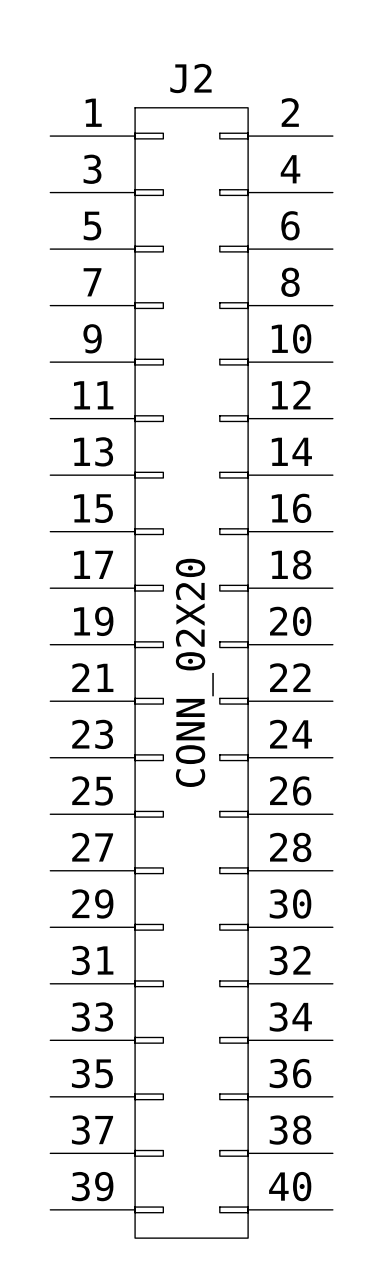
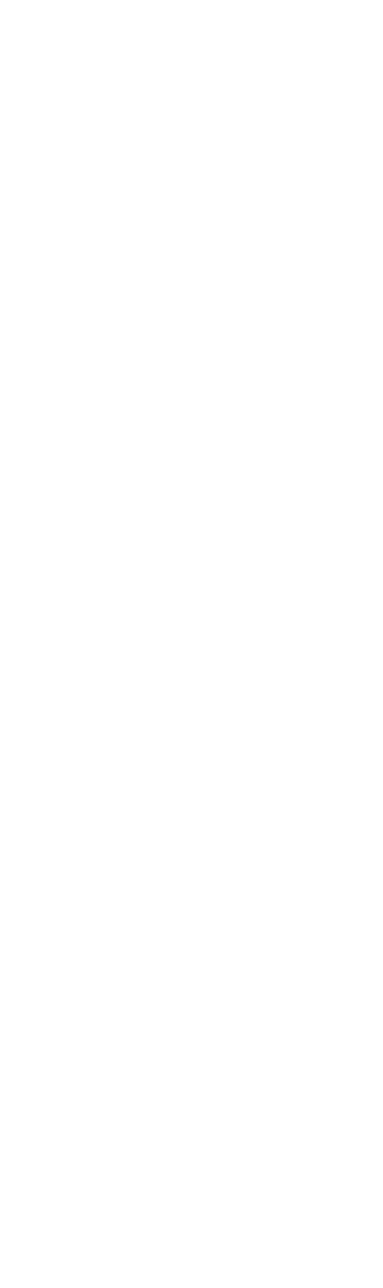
J2: CONN_02X20 (191, 672) -> none

